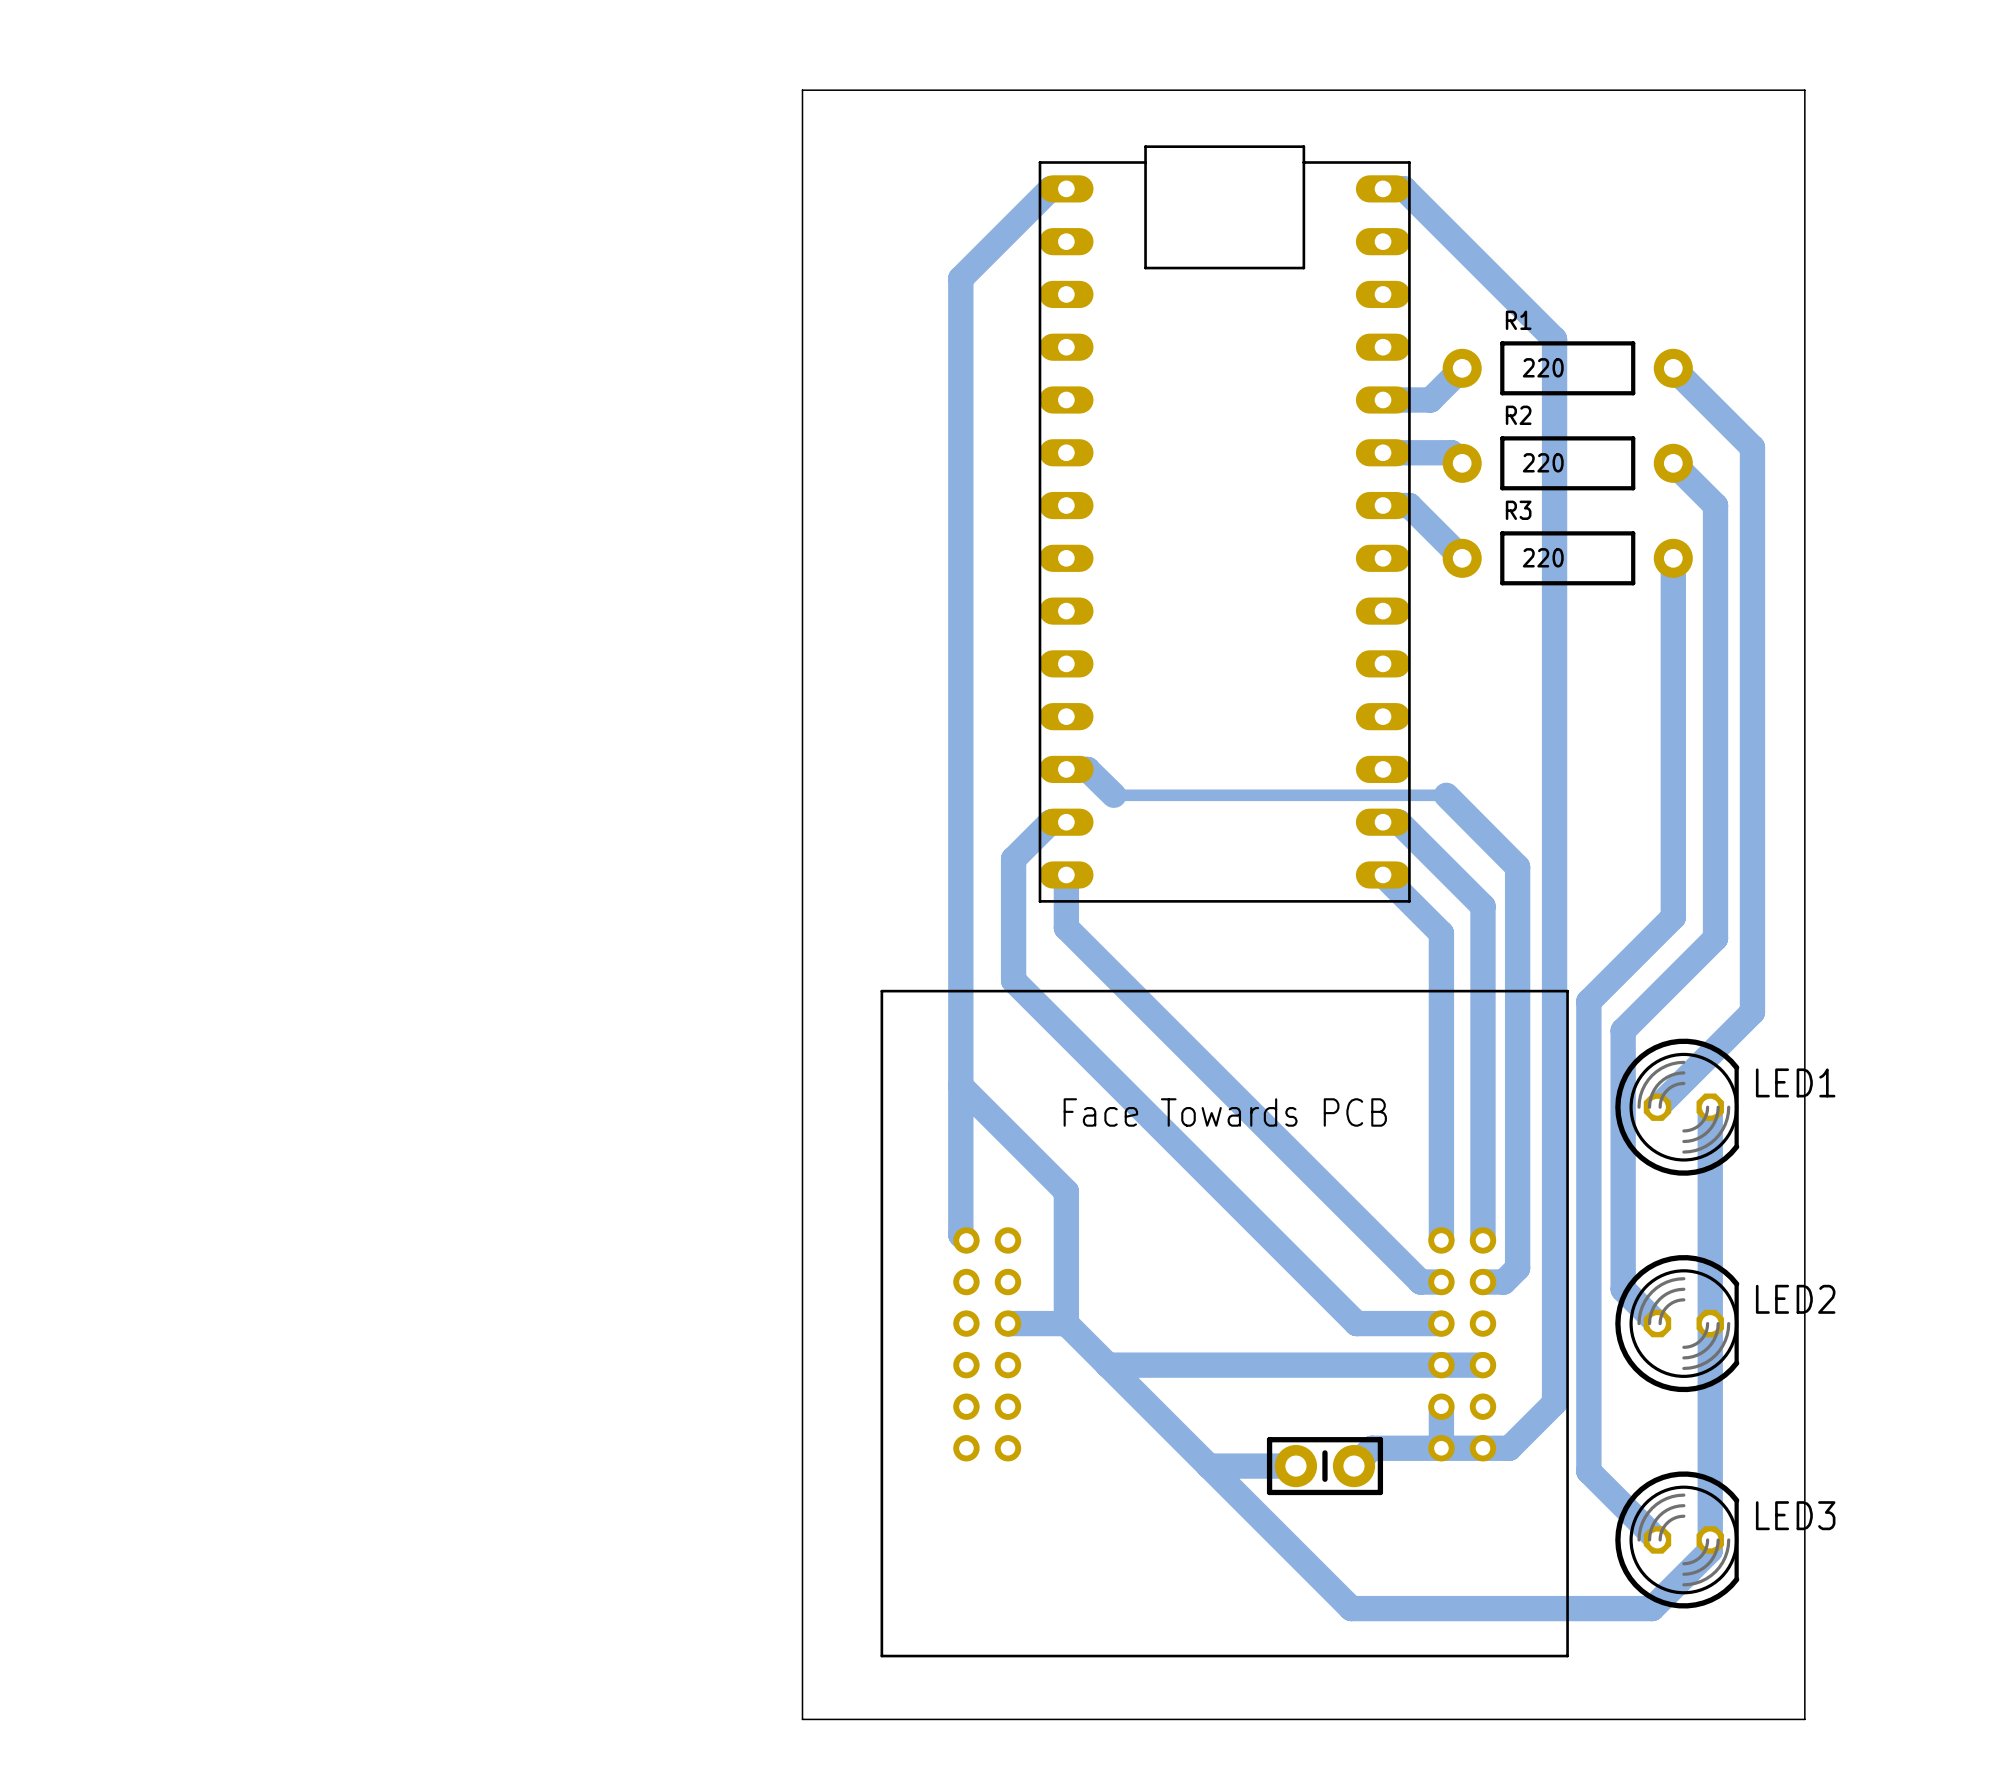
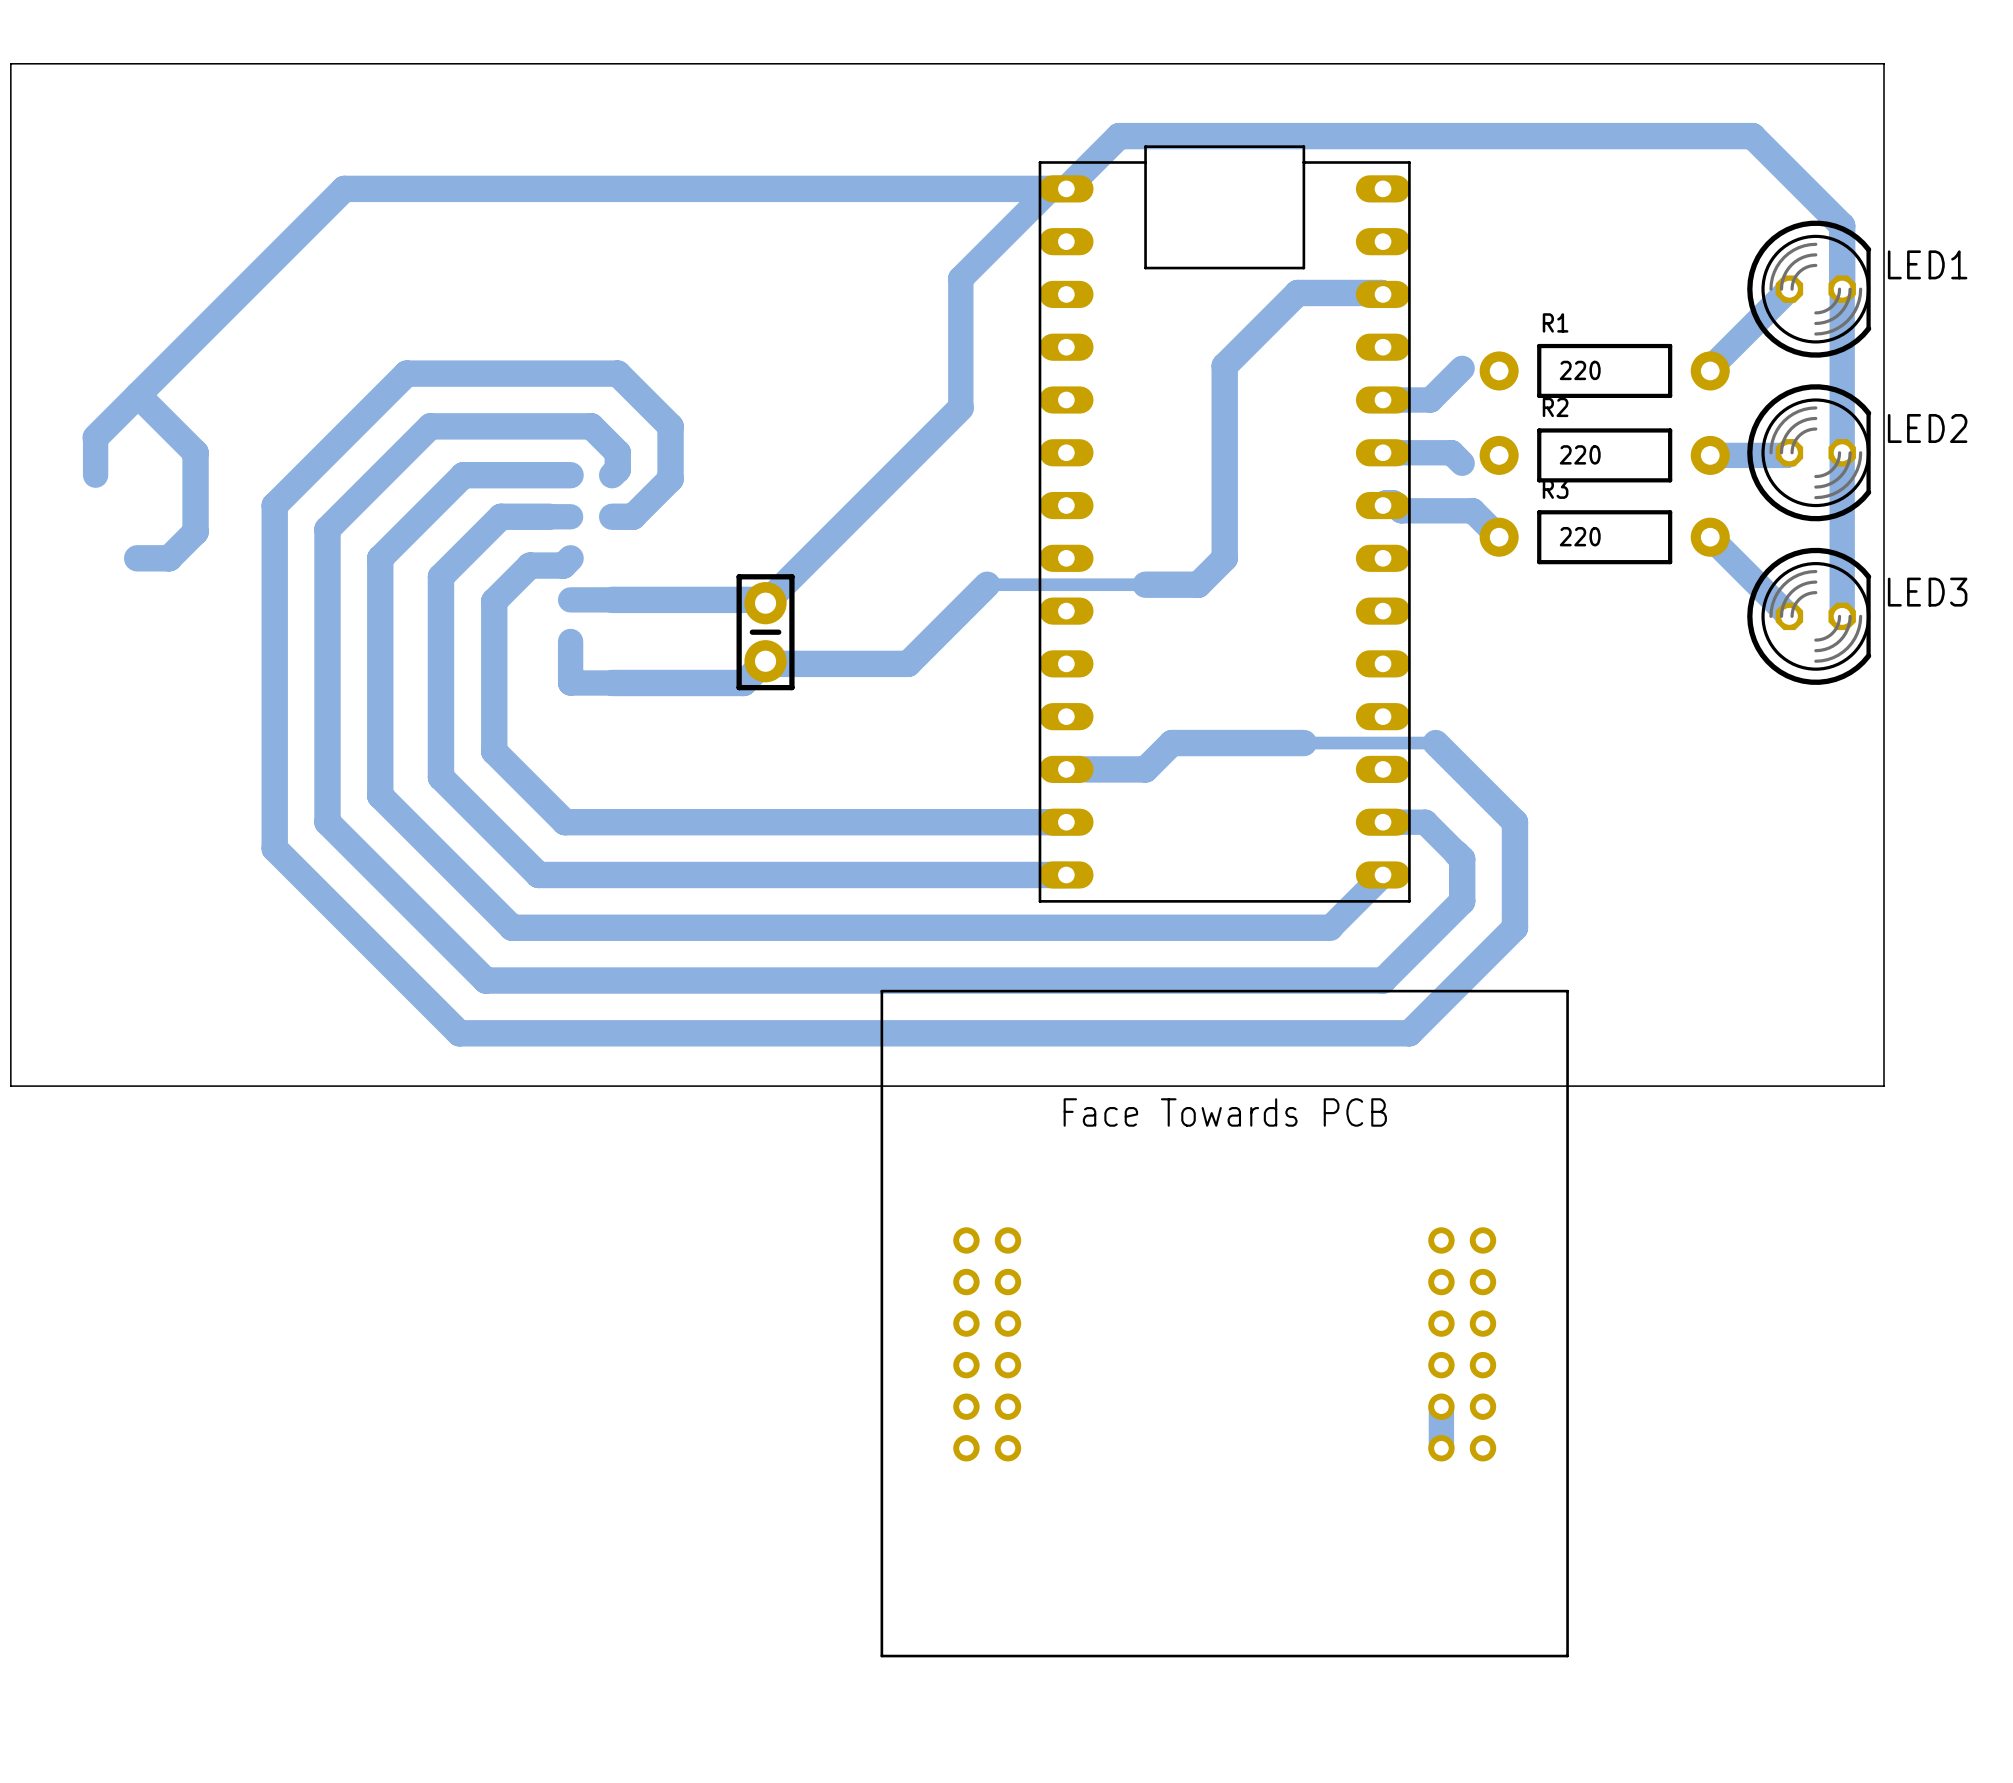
board edge: none -> (10, 63) (1884, 63) (1884, 1086) (10, 1086) (10, 63)
board edge: (802, 90) (1804, 90) (1804, 1719) (802, 1719) (802, 90) -> none
bottom track: (1383, 188) (1404, 188) (1554, 339) (1554, 1403) (1509, 1448) (1371, 1448) (1354, 1466) -> none
bottom track: none -> (1789, 289) (1710, 368) (1710, 370)
bottom track: none -> (1383, 294) (1297, 292) (1224, 365) (1224, 558) (1198, 584) (987, 584) (908, 663) (768, 663) (765, 661) (743, 682) (612, 682)
R1 position: (1567, 368) -> (1604, 370)
bottom track: (1673, 368) (1752, 447) (1752, 1012) (1657, 1107) -> none
bottom track: none -> (138, 395) (195, 452) (195, 531) (169, 558) (137, 558)
bottom track: (960, 407) (960, 1234) (966, 1240) -> (960, 407) (765, 603) (762, 599) (570, 599)
bottom track: none -> (1789, 452) (1786, 455) (1710, 455)
R2 position: (1567, 463) -> (1604, 455)
bottom track: (1673, 463) (1715, 505) (1715, 938) (1623, 1030) (1623, 1289) (1657, 1323) -> none
bottom track: none -> (95, 475) (95, 437) (344, 188) (1066, 188) (1119, 136) (1752, 136) (1842, 225) (1842, 616)
bottom track: (1383, 505) (1409, 505) (1462, 558) -> (1383, 505) (1385, 502) (1393, 502) (1401, 510) (1472, 510) (1499, 537)
bottom track: none -> (1710, 537) (1789, 616)
bottom track: none -> (570, 558) (563, 565) (530, 565) (494, 601) (494, 751) (564, 822) (1066, 822)
R3 position: (1567, 558) -> (1604, 537)
bottom track: (1673, 558) (1673, 917) (1588, 1001) (1588, 1471) (1657, 1539) -> none
part: none -> (765, 632)
bottom track: none -> (570, 641) (570, 682) (638, 682)
bottom track: (1087, 769) (1113, 795) (1446, 795) (1517, 867) (1517, 1268) (1503, 1282) (1482, 1282) -> (1087, 769) (1145, 769) (1171, 743) (1435, 743) (1514, 822) (1514, 927) (1409, 1033) (459, 1033) (274, 848) (274, 505) (406, 373) (617, 373) (670, 426) (670, 479) (632, 516) (612, 516)
bottom track: (1050, 822) (1013, 859) (1013, 980) (1356, 1323) (1441, 1323) -> none
bottom track: (1398, 822) (1482, 906) (1482, 1240) -> (1398, 822) (1425, 822) (1462, 859) (1462, 901) (1383, 980) (485, 980) (327, 822) (327, 529) (430, 426) (591, 426) (617, 452) (617, 469) (612, 475)
bottom track: (1066, 874) (1066, 927) (1420, 1282) (1441, 1282) -> (1066, 874) (538, 874) (440, 777) (440, 576) (500, 516) (570, 516)
bottom track: (1383, 874) (1441, 933) (1441, 1240) -> (1383, 874) (1330, 927) (512, 927) (380, 795) (380, 558) (463, 475) (570, 475)
bottom track: (960, 1086) (1066, 1191) (1066, 1323) -> none
LED1 position: (1677, 1107) -> (1809, 289)
bottom track: (1710, 1107) (1710, 1550) (1652, 1608) (1351, 1608) (1066, 1323) -> none
bottom track: (1007, 1323) (1066, 1323) -> none
LED2 position: (1677, 1323) -> (1809, 452)
bottom track: (1107, 1365) (1482, 1365) -> none
bottom track: (1208, 1466) (1295, 1466) -> none
part: (1324, 1466) -> none
LED3 position: (1677, 1539) -> (1809, 616)

